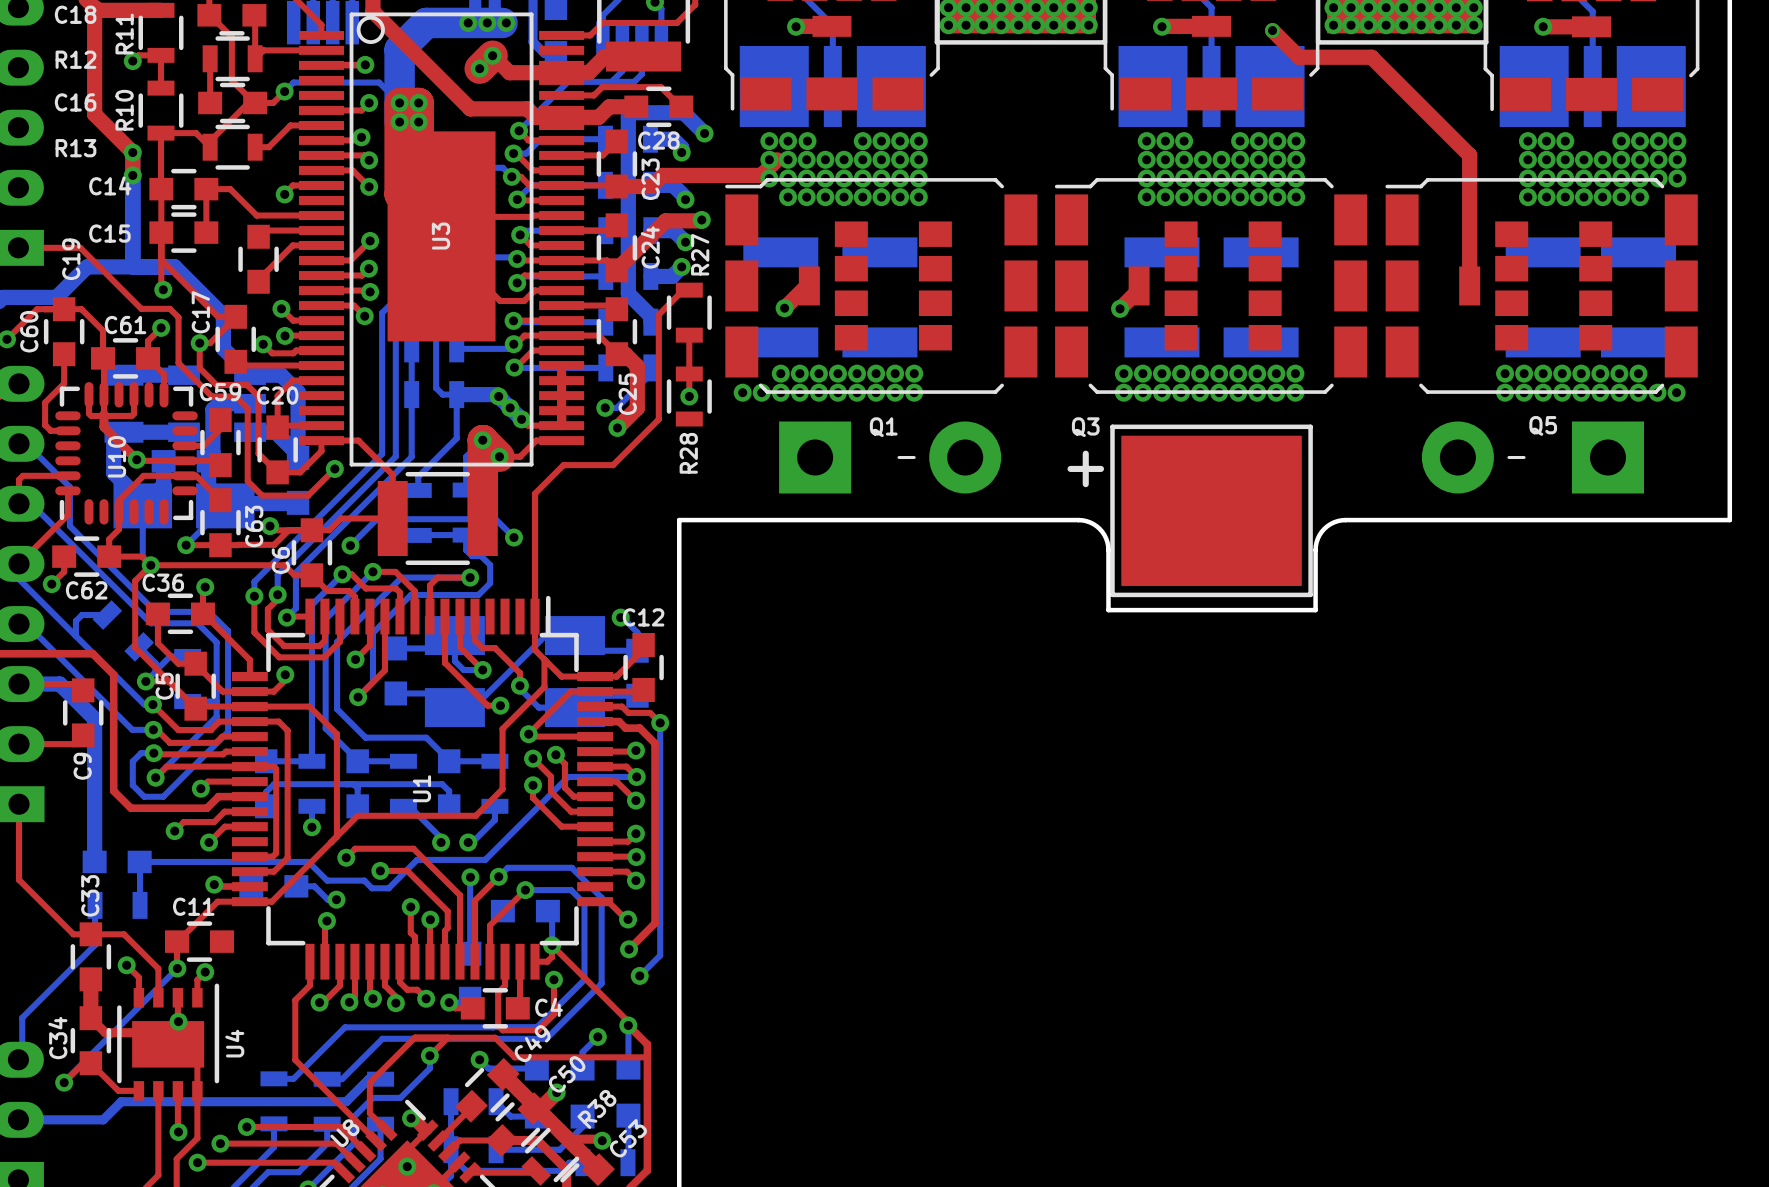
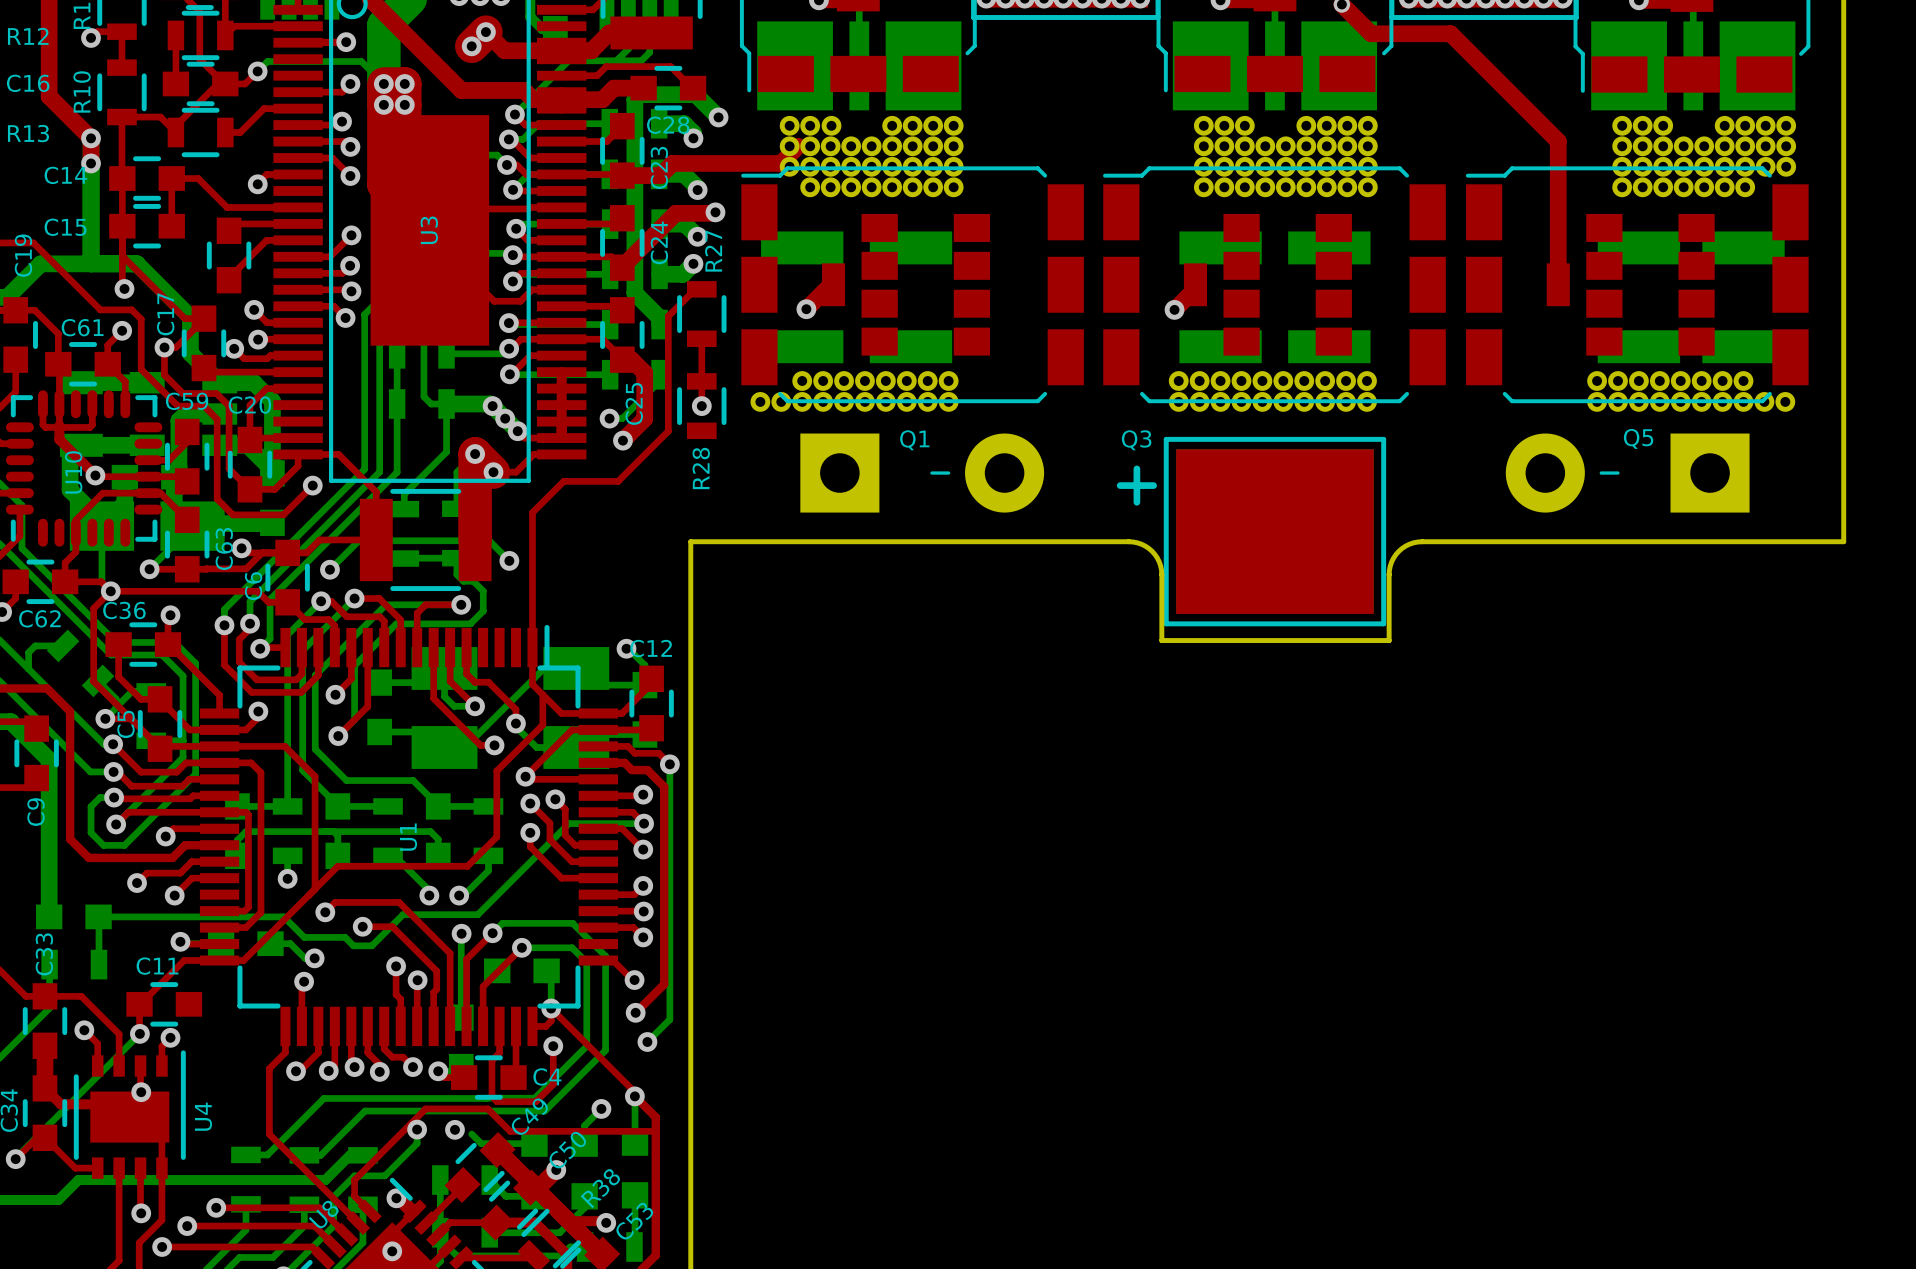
top track: (447, 1037) (429, 1055) -> none
top track: (495, 1037) (414, 1037) (369, 1082) (369, 1113) (372, 1116) -> (488, 1109) (425, 1108) (354, 1180) (354, 1196)
via position: (479, 1059) -> (454, 1129)

